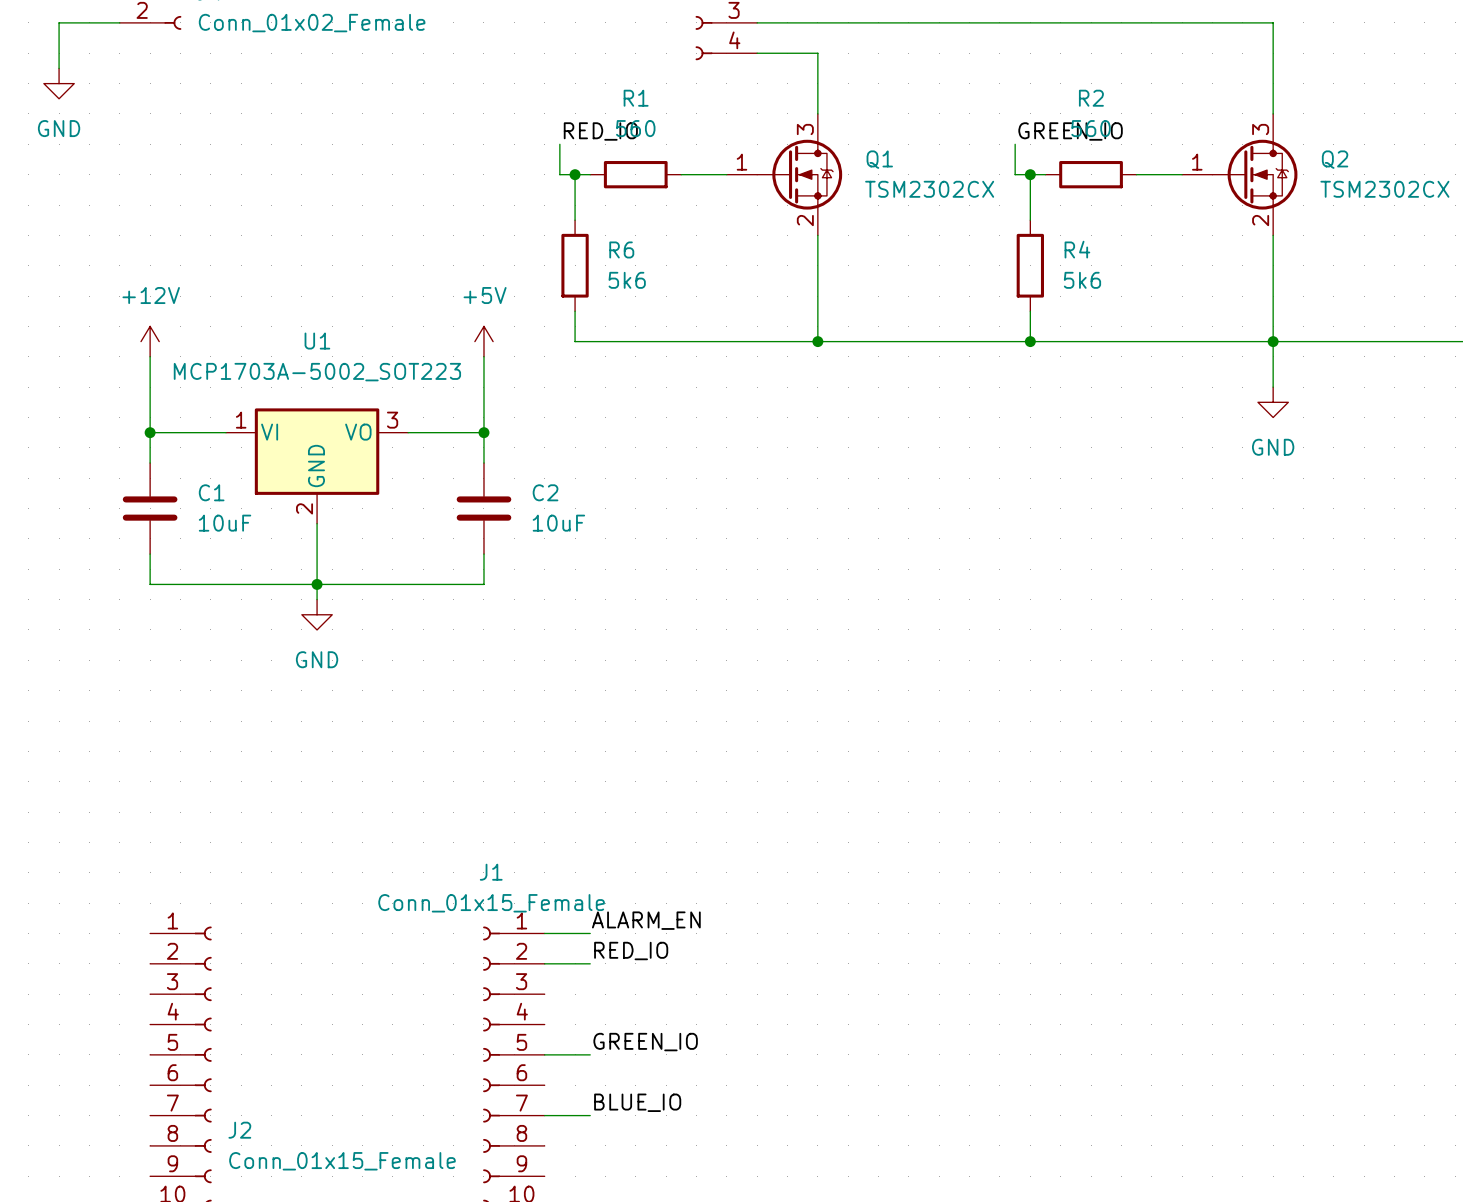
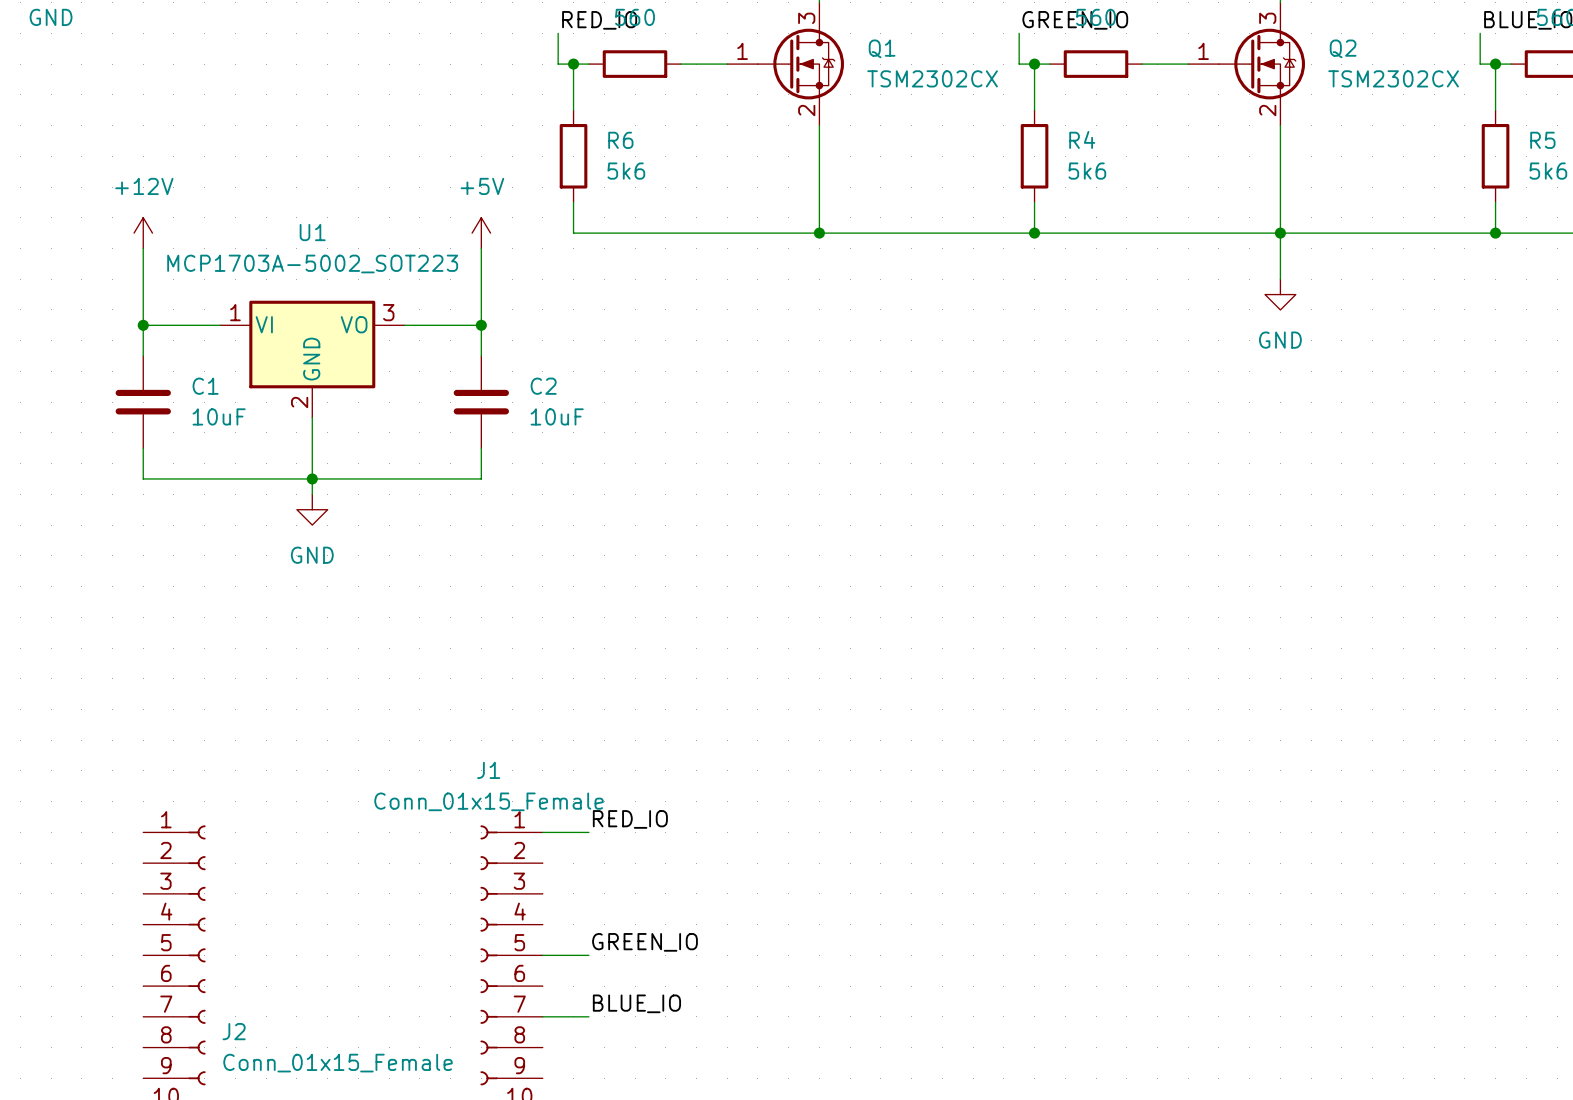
label: ALARM_EN (646, 920) -> RED_IO (630, 819)
label: RED_IO (631, 951) -> none
wire: (544, 963) (590, 963) -> none

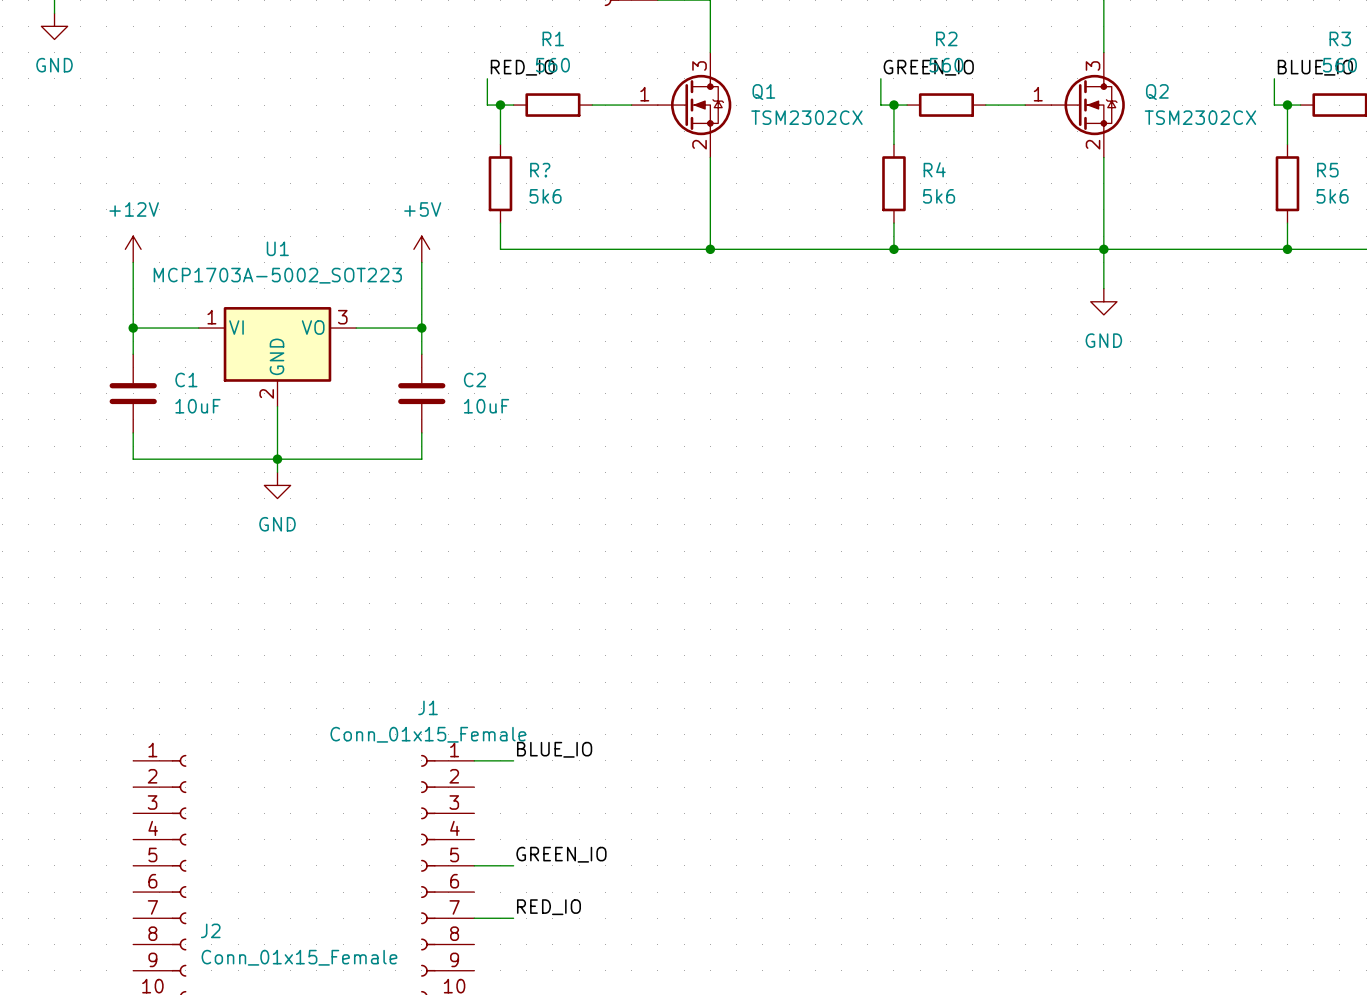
R6 name: R6 (620, 140) -> R? (540, 170)
label: RED_IO (630, 819) -> BLUE_IO (554, 749)
label: BLUE_IO (636, 1003) -> RED_IO (548, 907)

